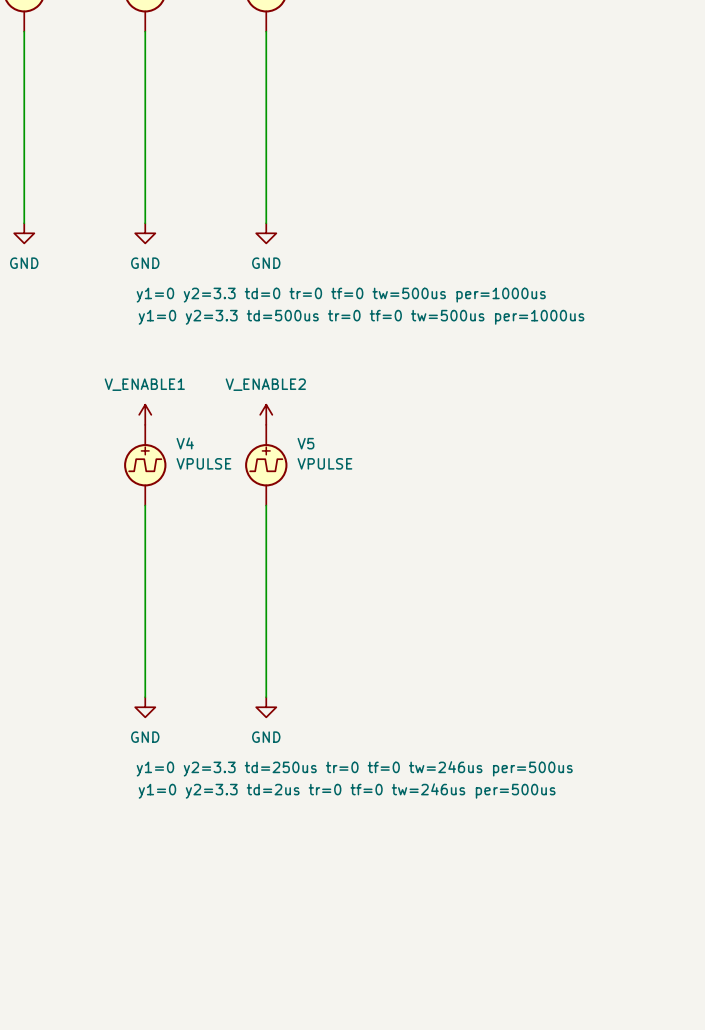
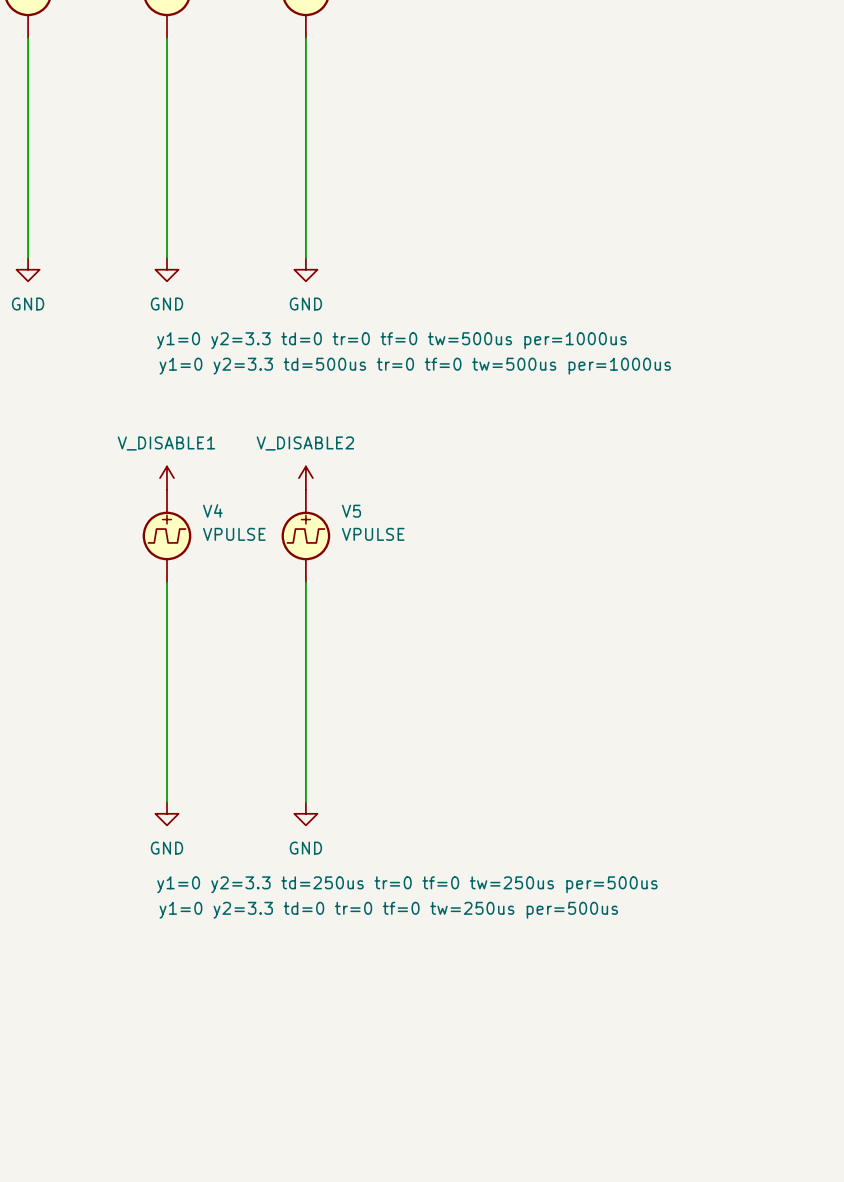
power symbol: V_ENABLE1 (145, 414) -> V_DISABLE1 (166, 478)
power symbol: V_ENABLE2 (266, 414) -> V_DISABLE2 (305, 478)
V5 text: y1=0 y2=3.3 td=250us tr=0 tf=0 tw=246us per=500us (354, 768) -> y1=0 y2=3.3 td=250us tr=0 tf=0 tw=250us per=500us (407, 884)
V4 text: y1=0 y2=3.3 td=2us tr=0 tf=0 tw=246us per=500us (347, 791) -> y1=0 y2=3.3 td=0 tr=0 tf=0 tw=250us per=500us (388, 910)

